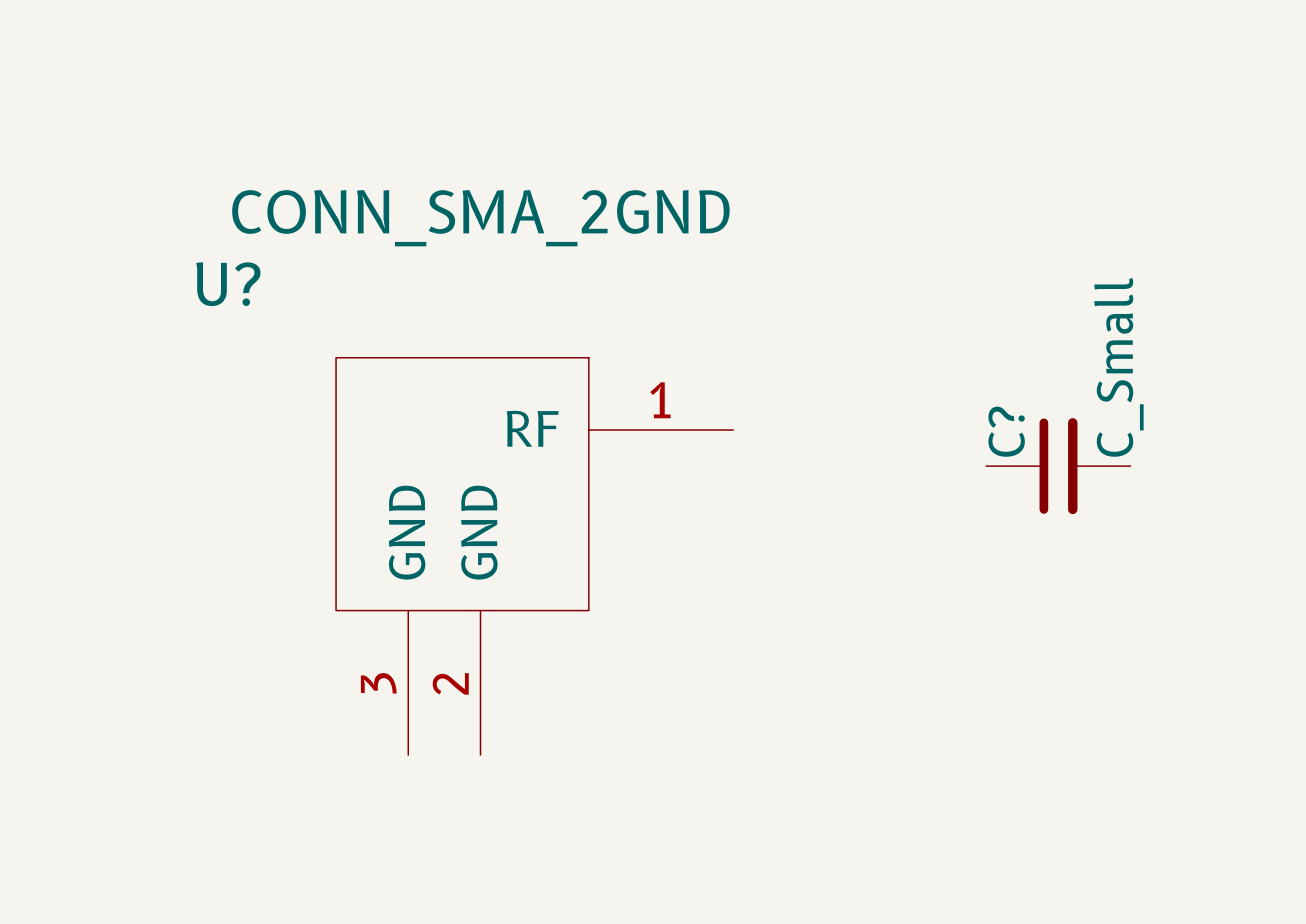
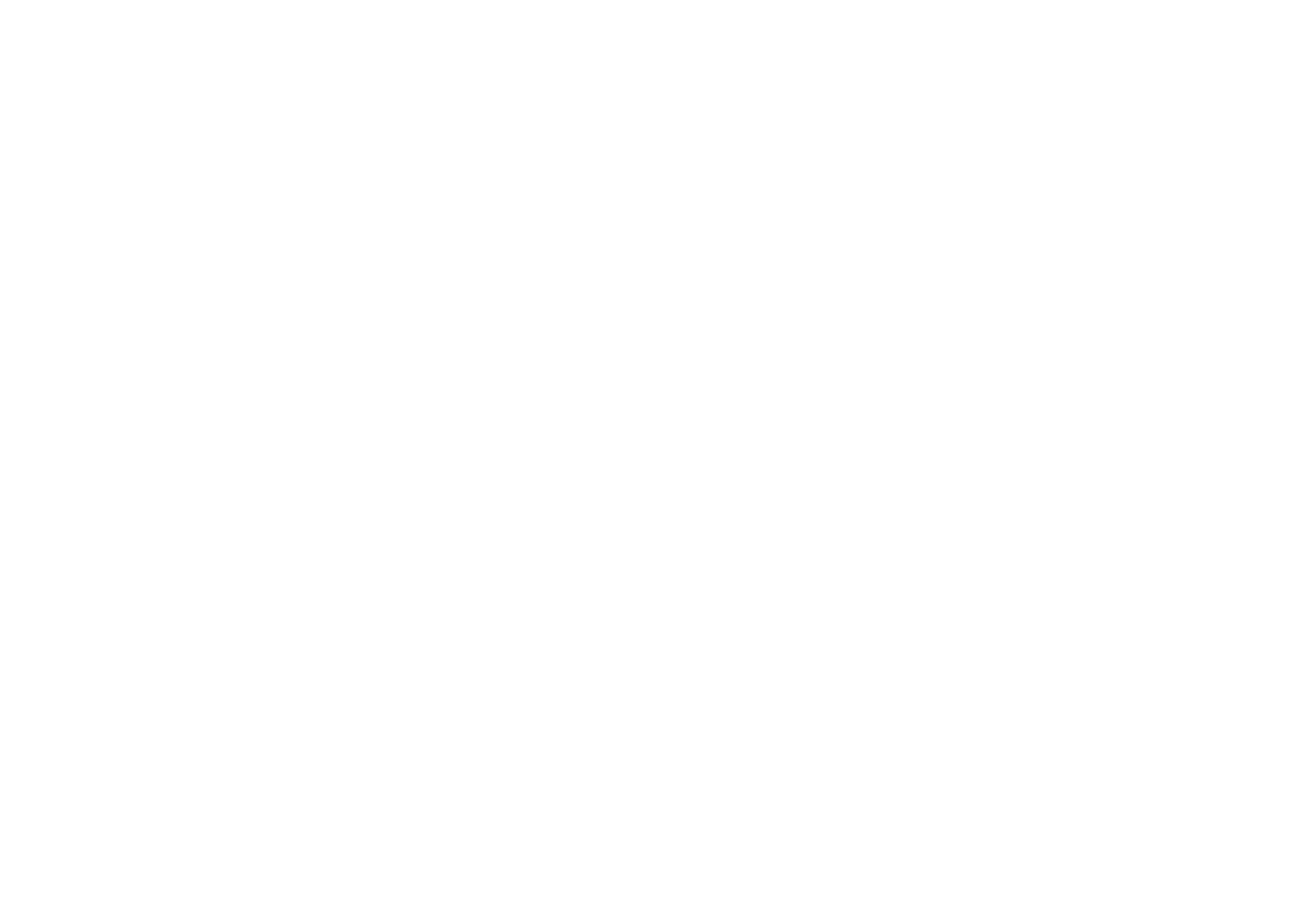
C?: C_Small (1058, 466) -> none
U?: CONN_SMA_2GND (534, 556) -> none

